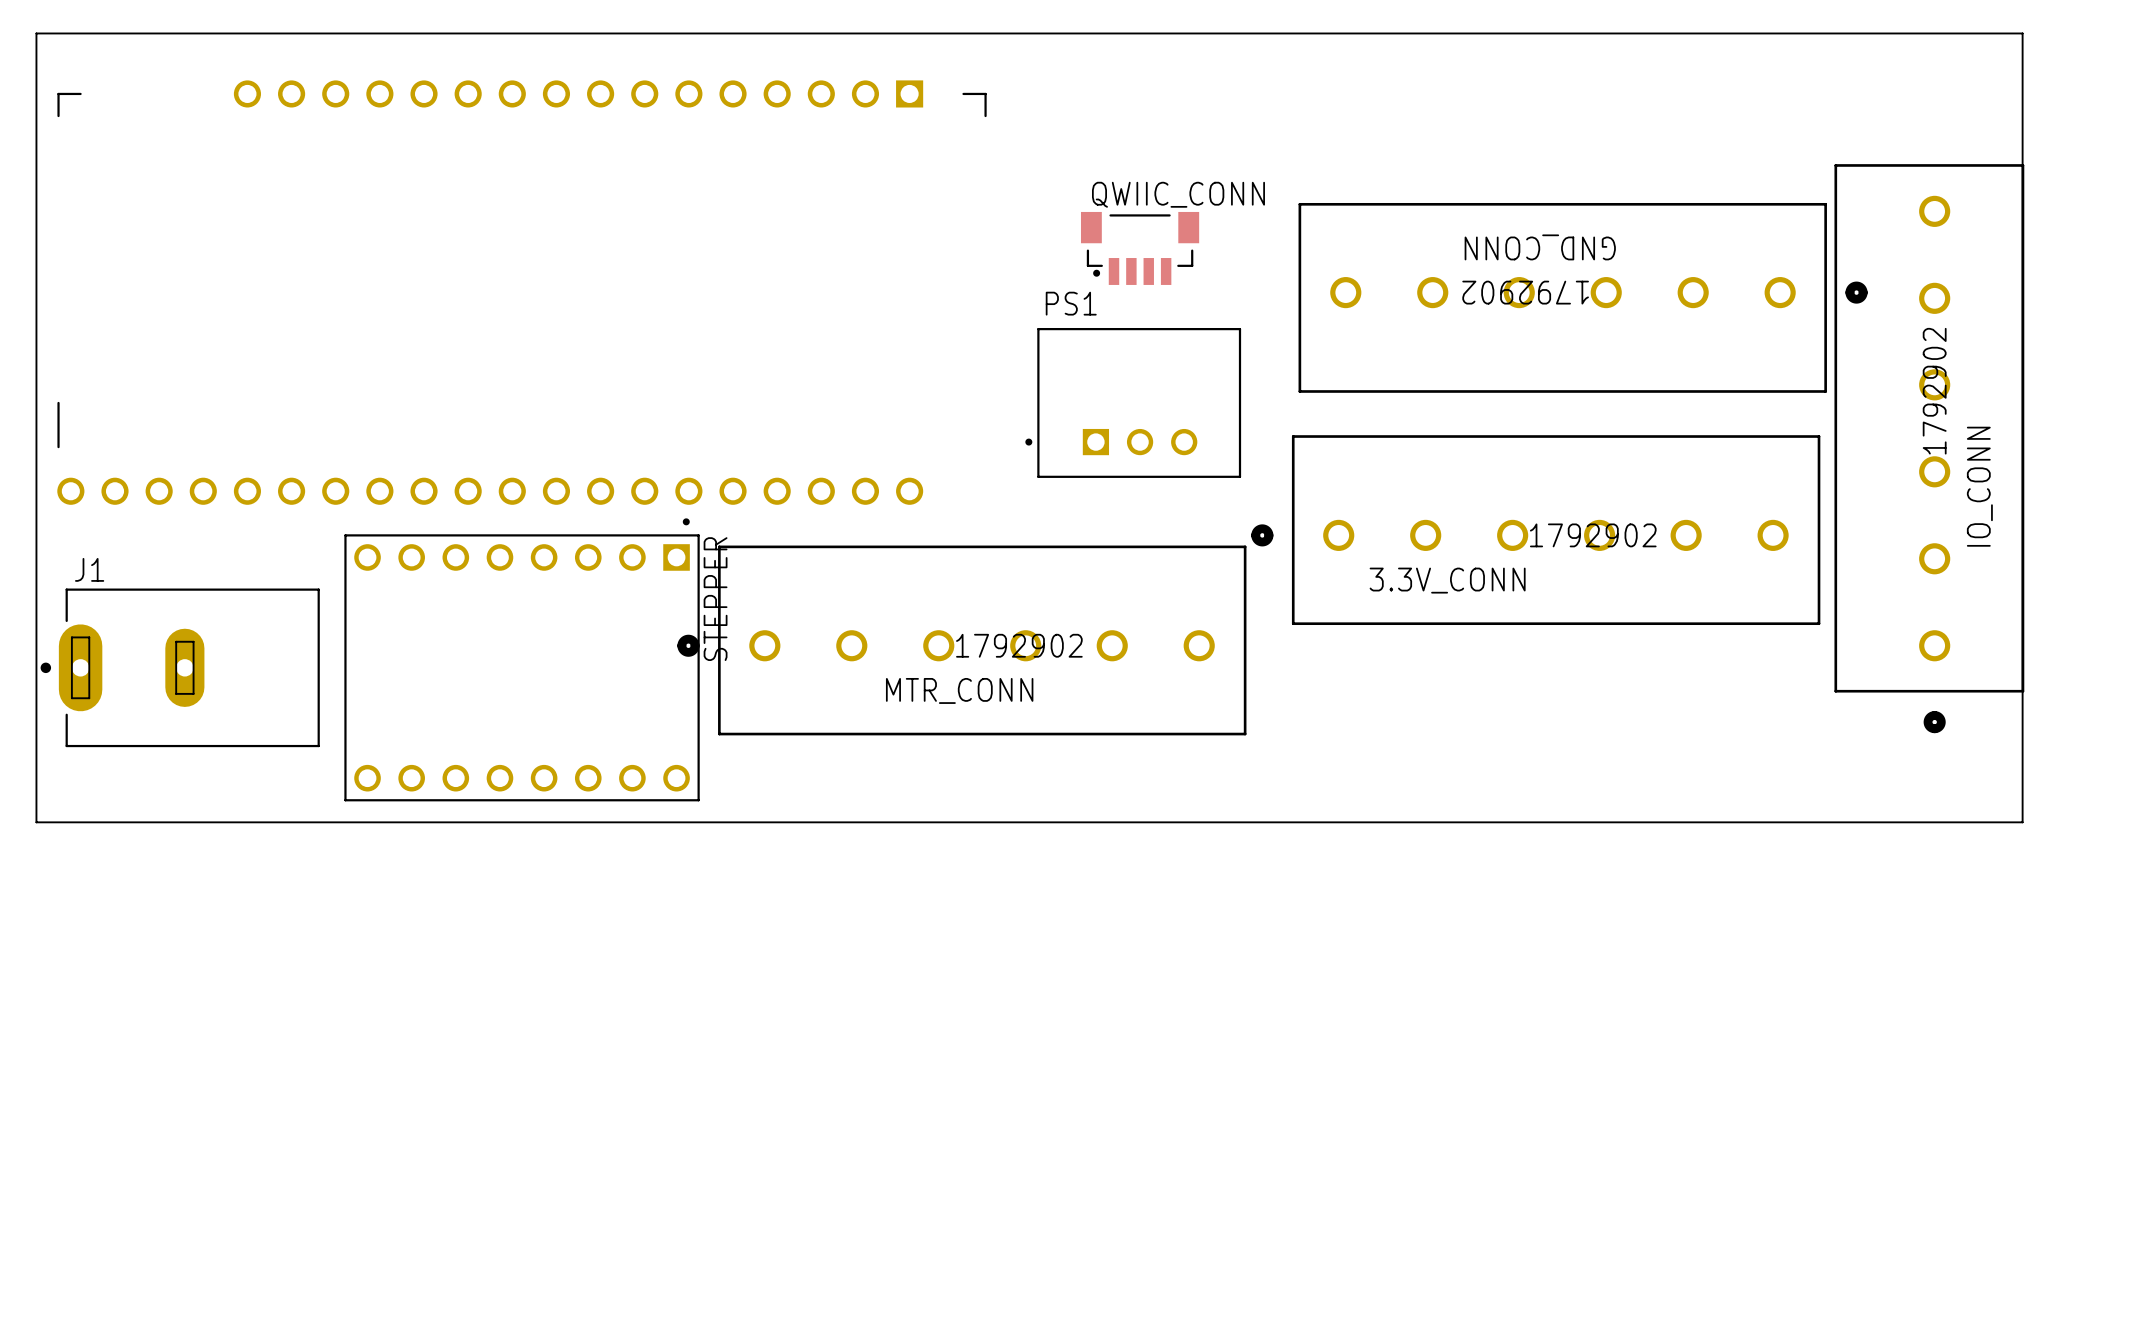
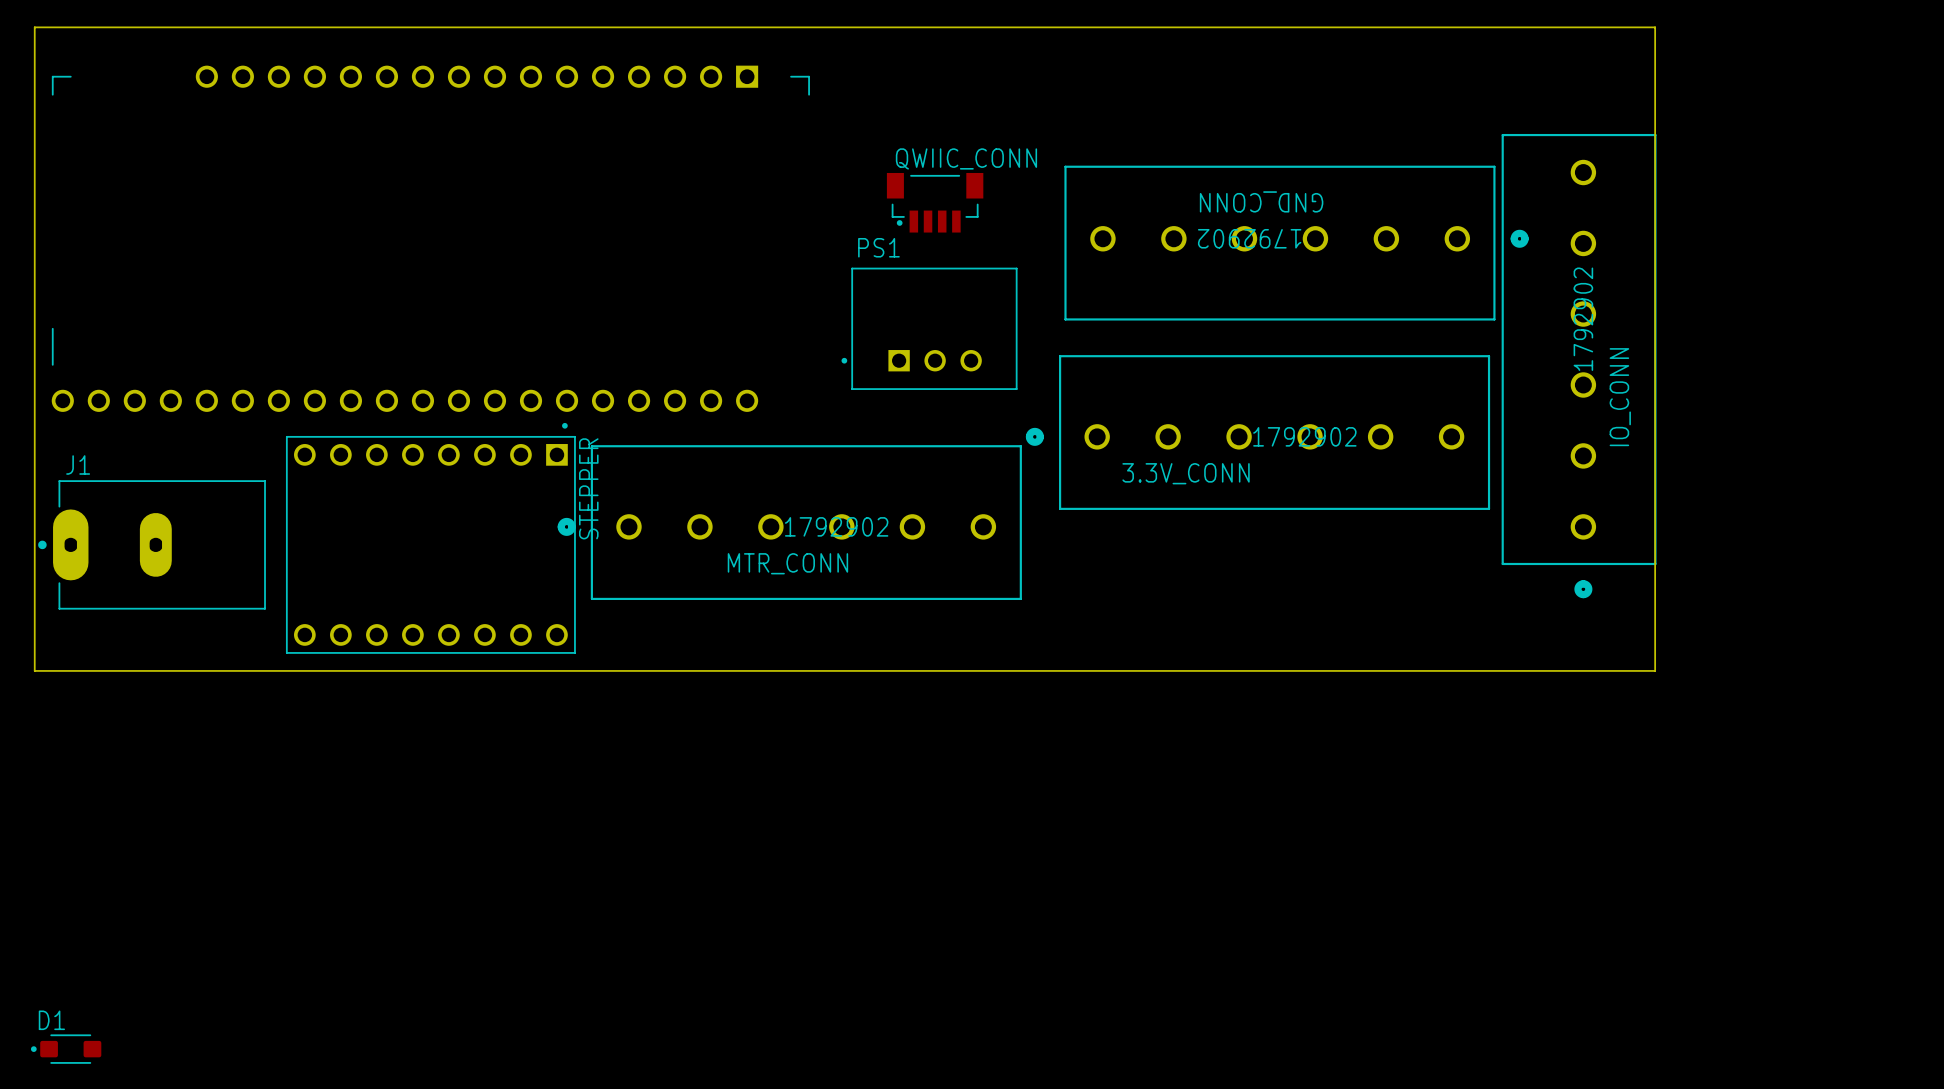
D1: none -> (66, 1049)

